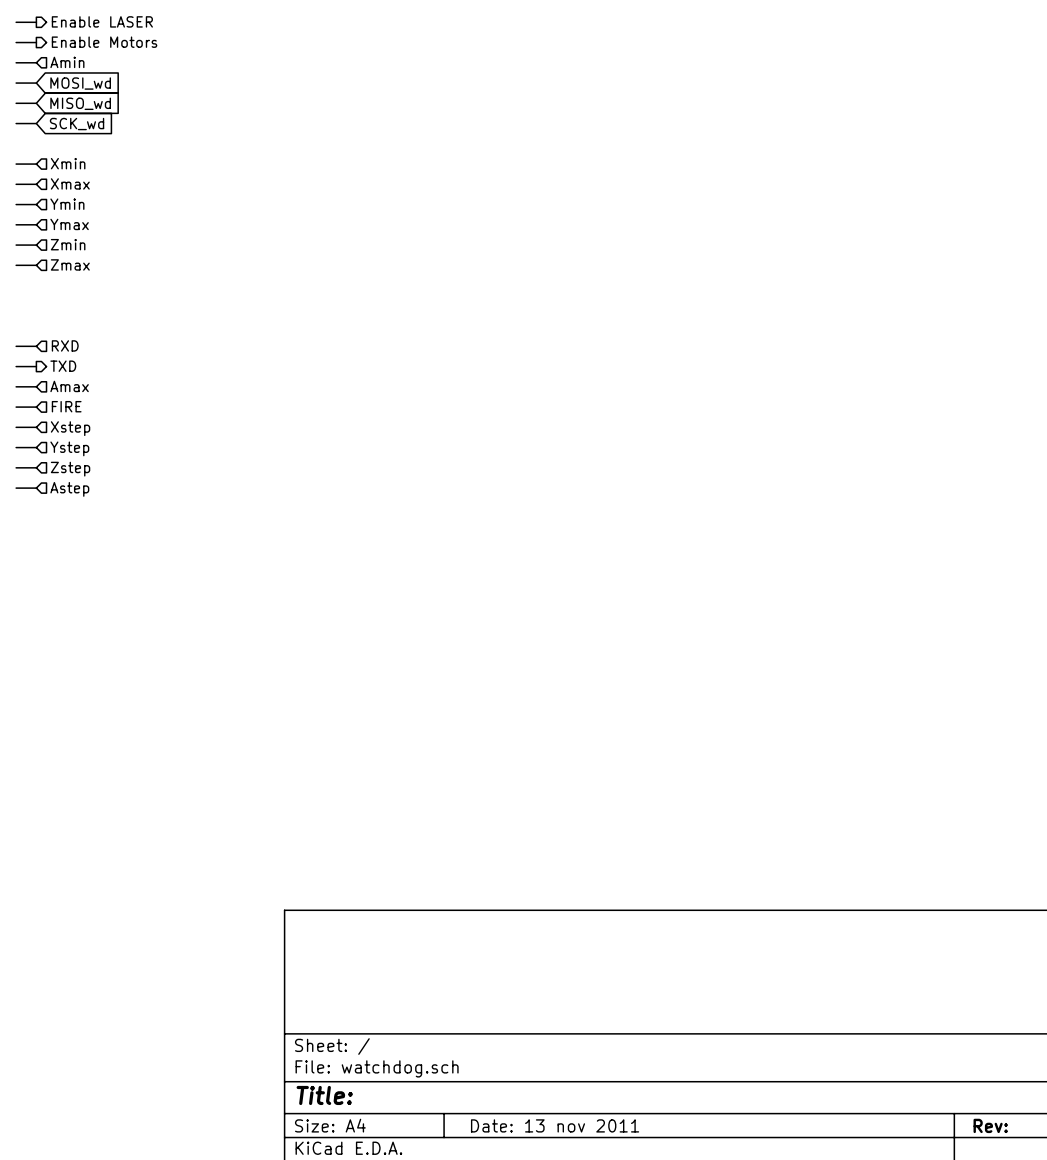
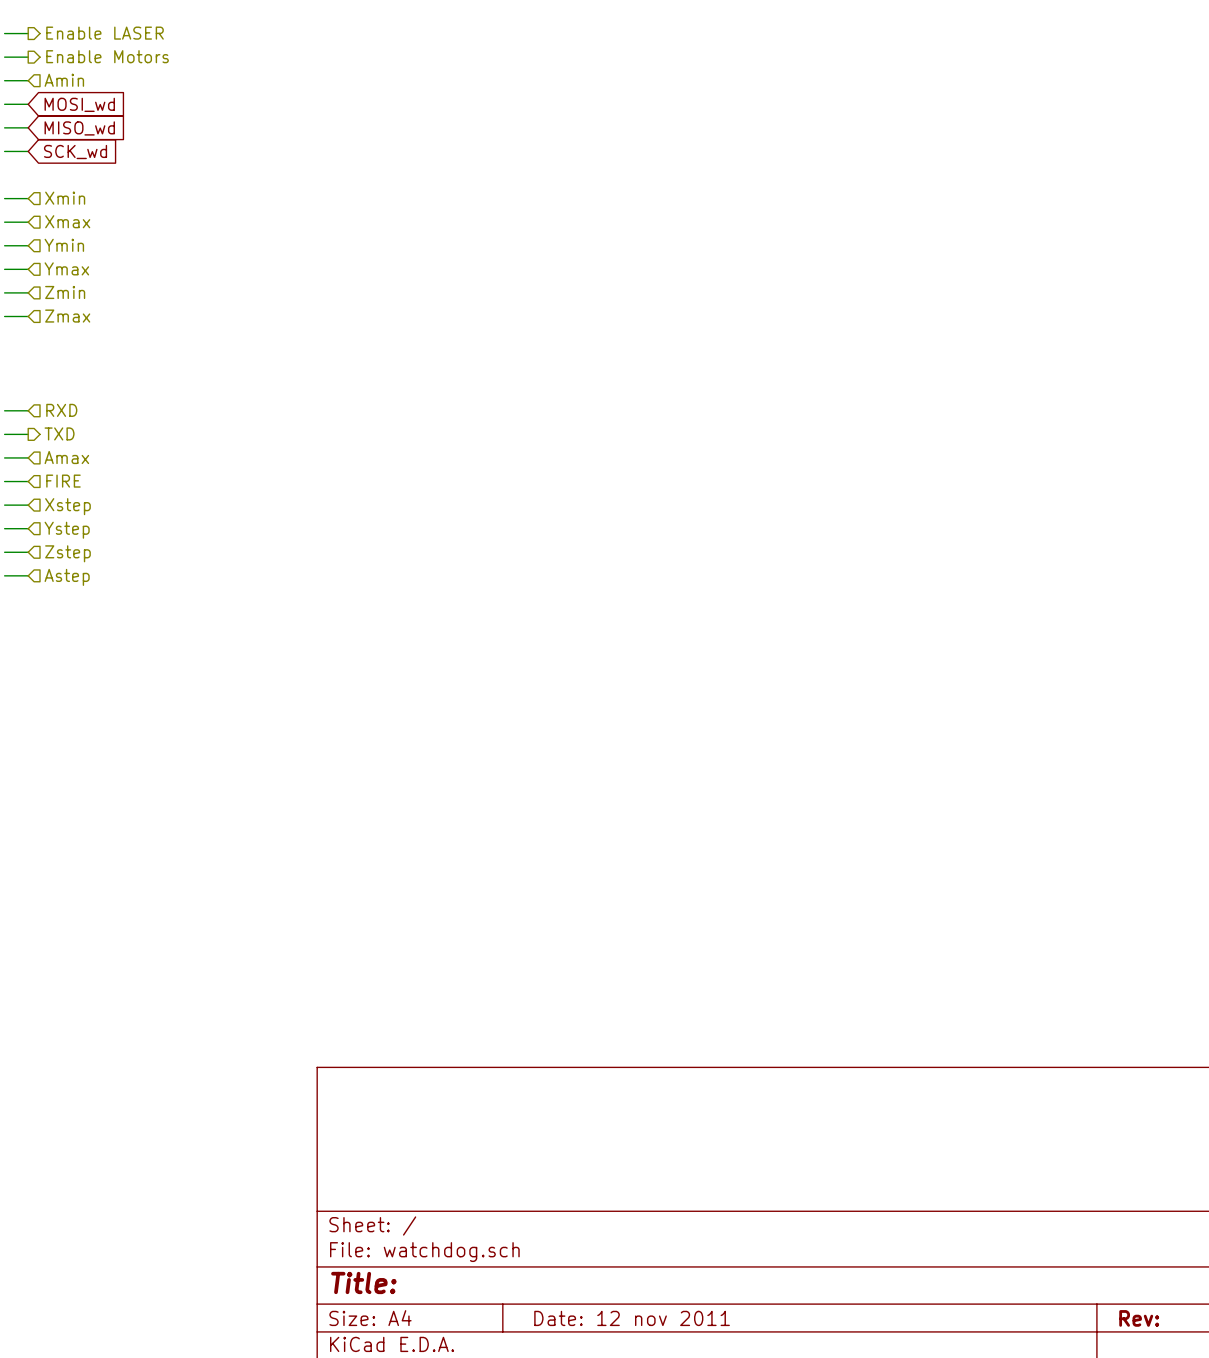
title block: Date: 13 nov 2011 (555, 1125) -> Date: 12 nov 2011 (632, 1318)

